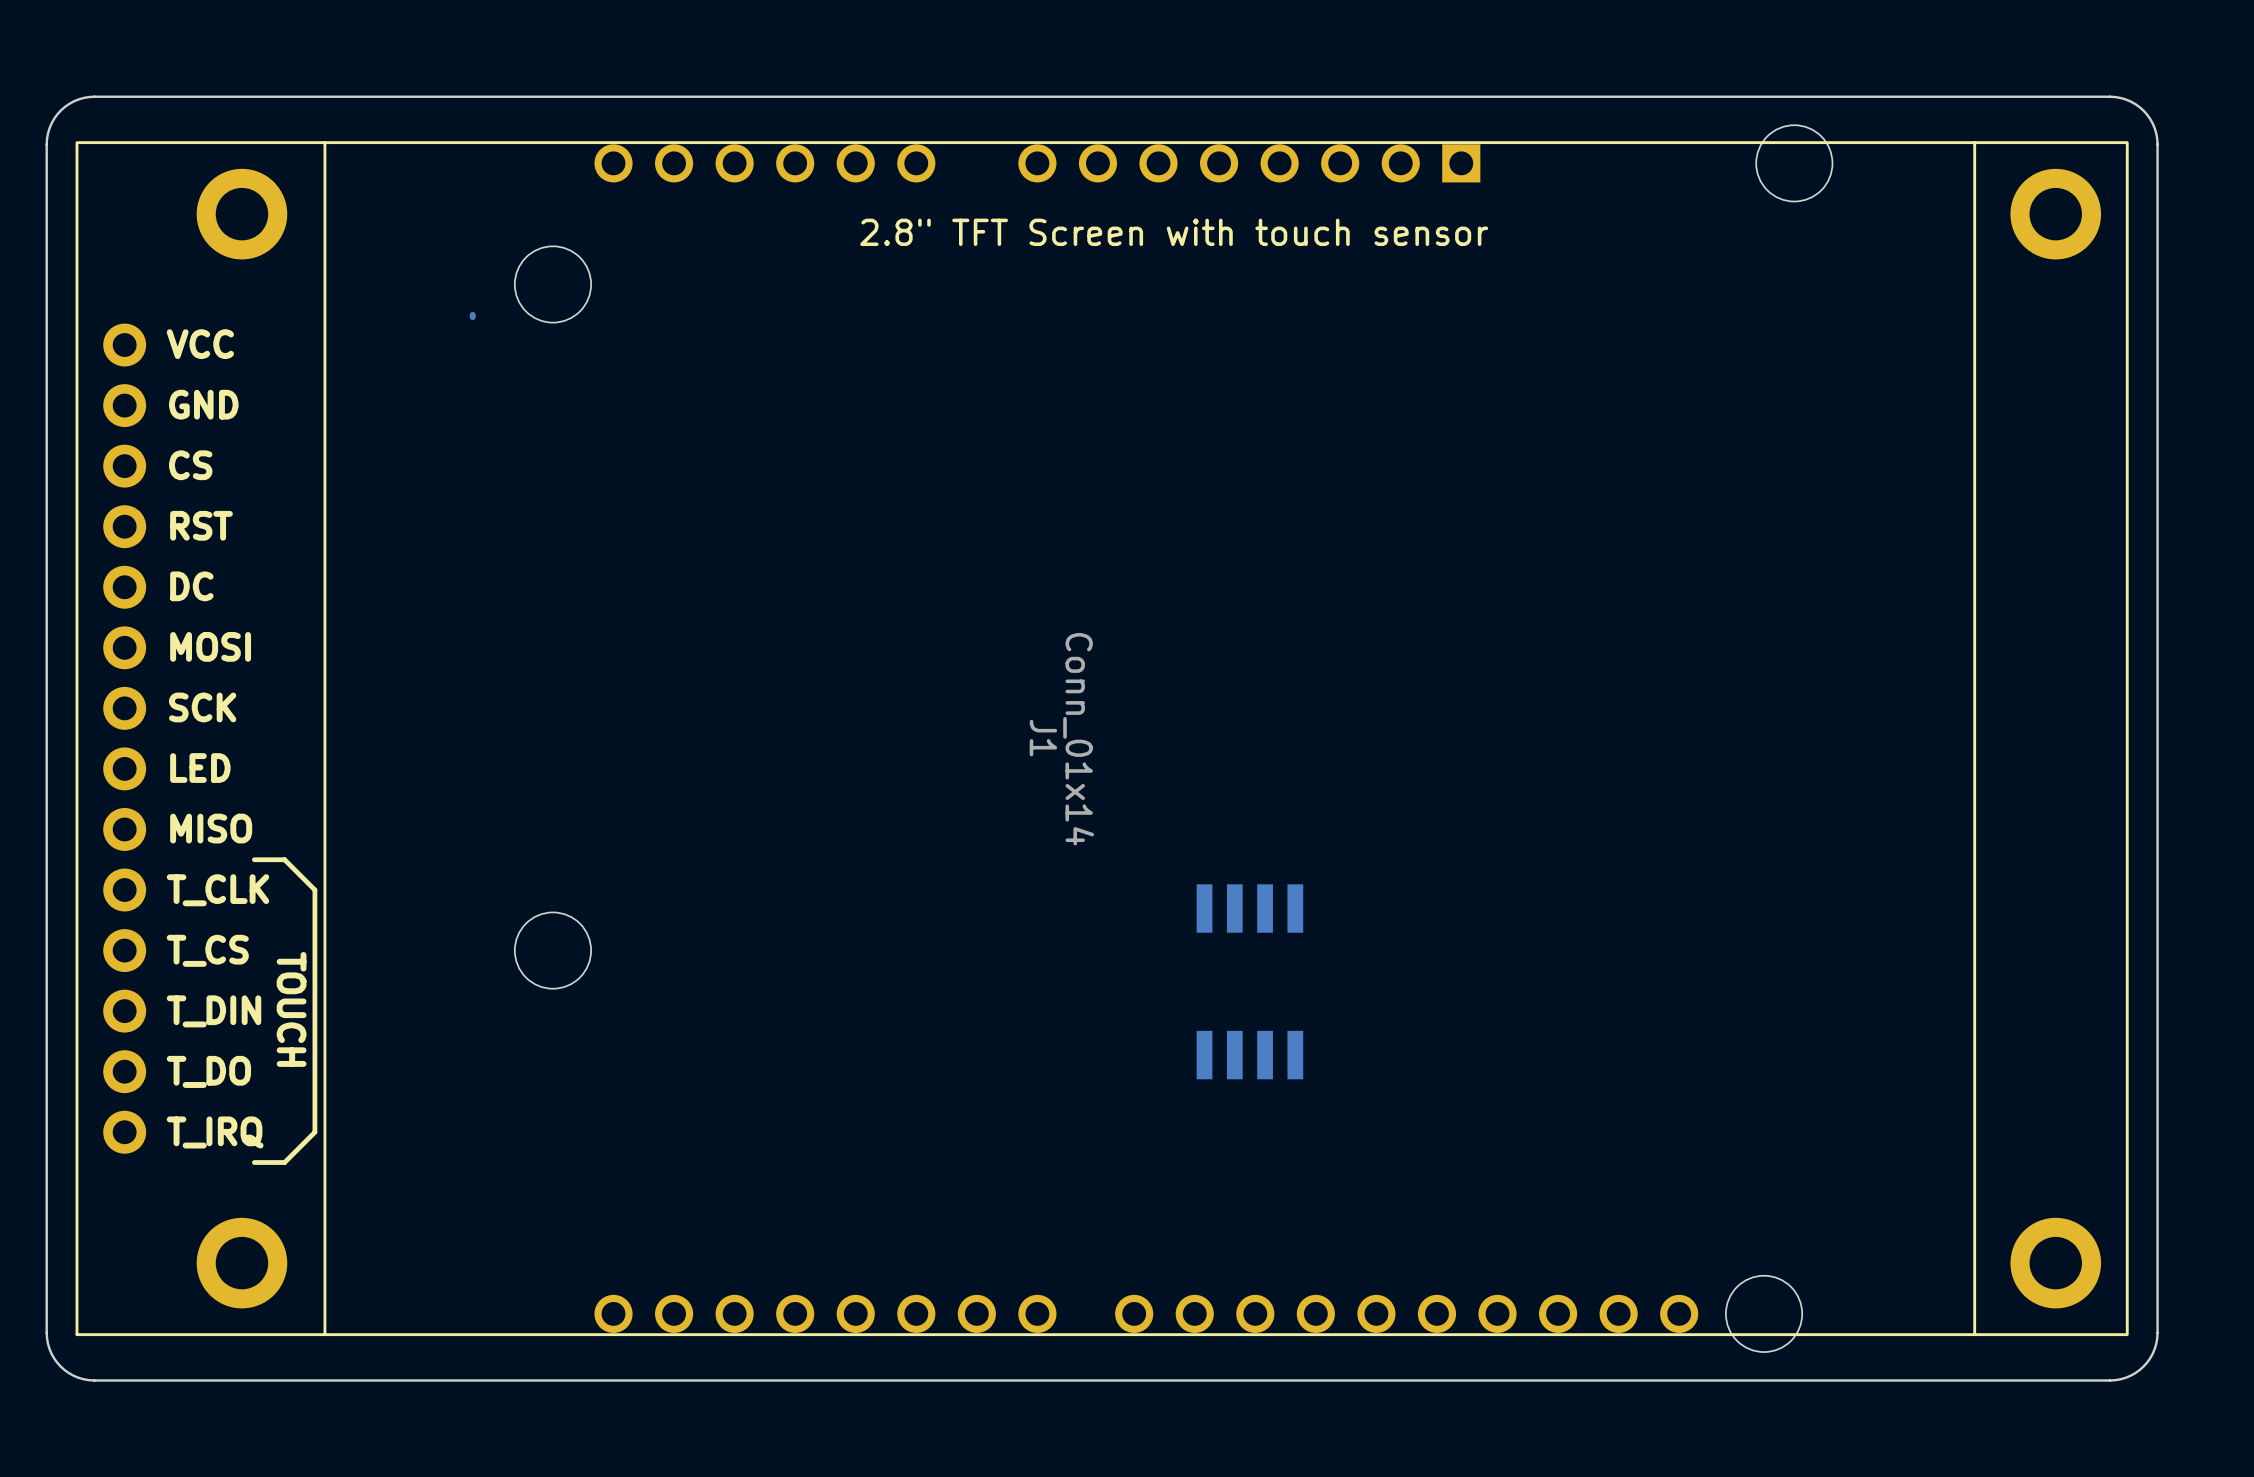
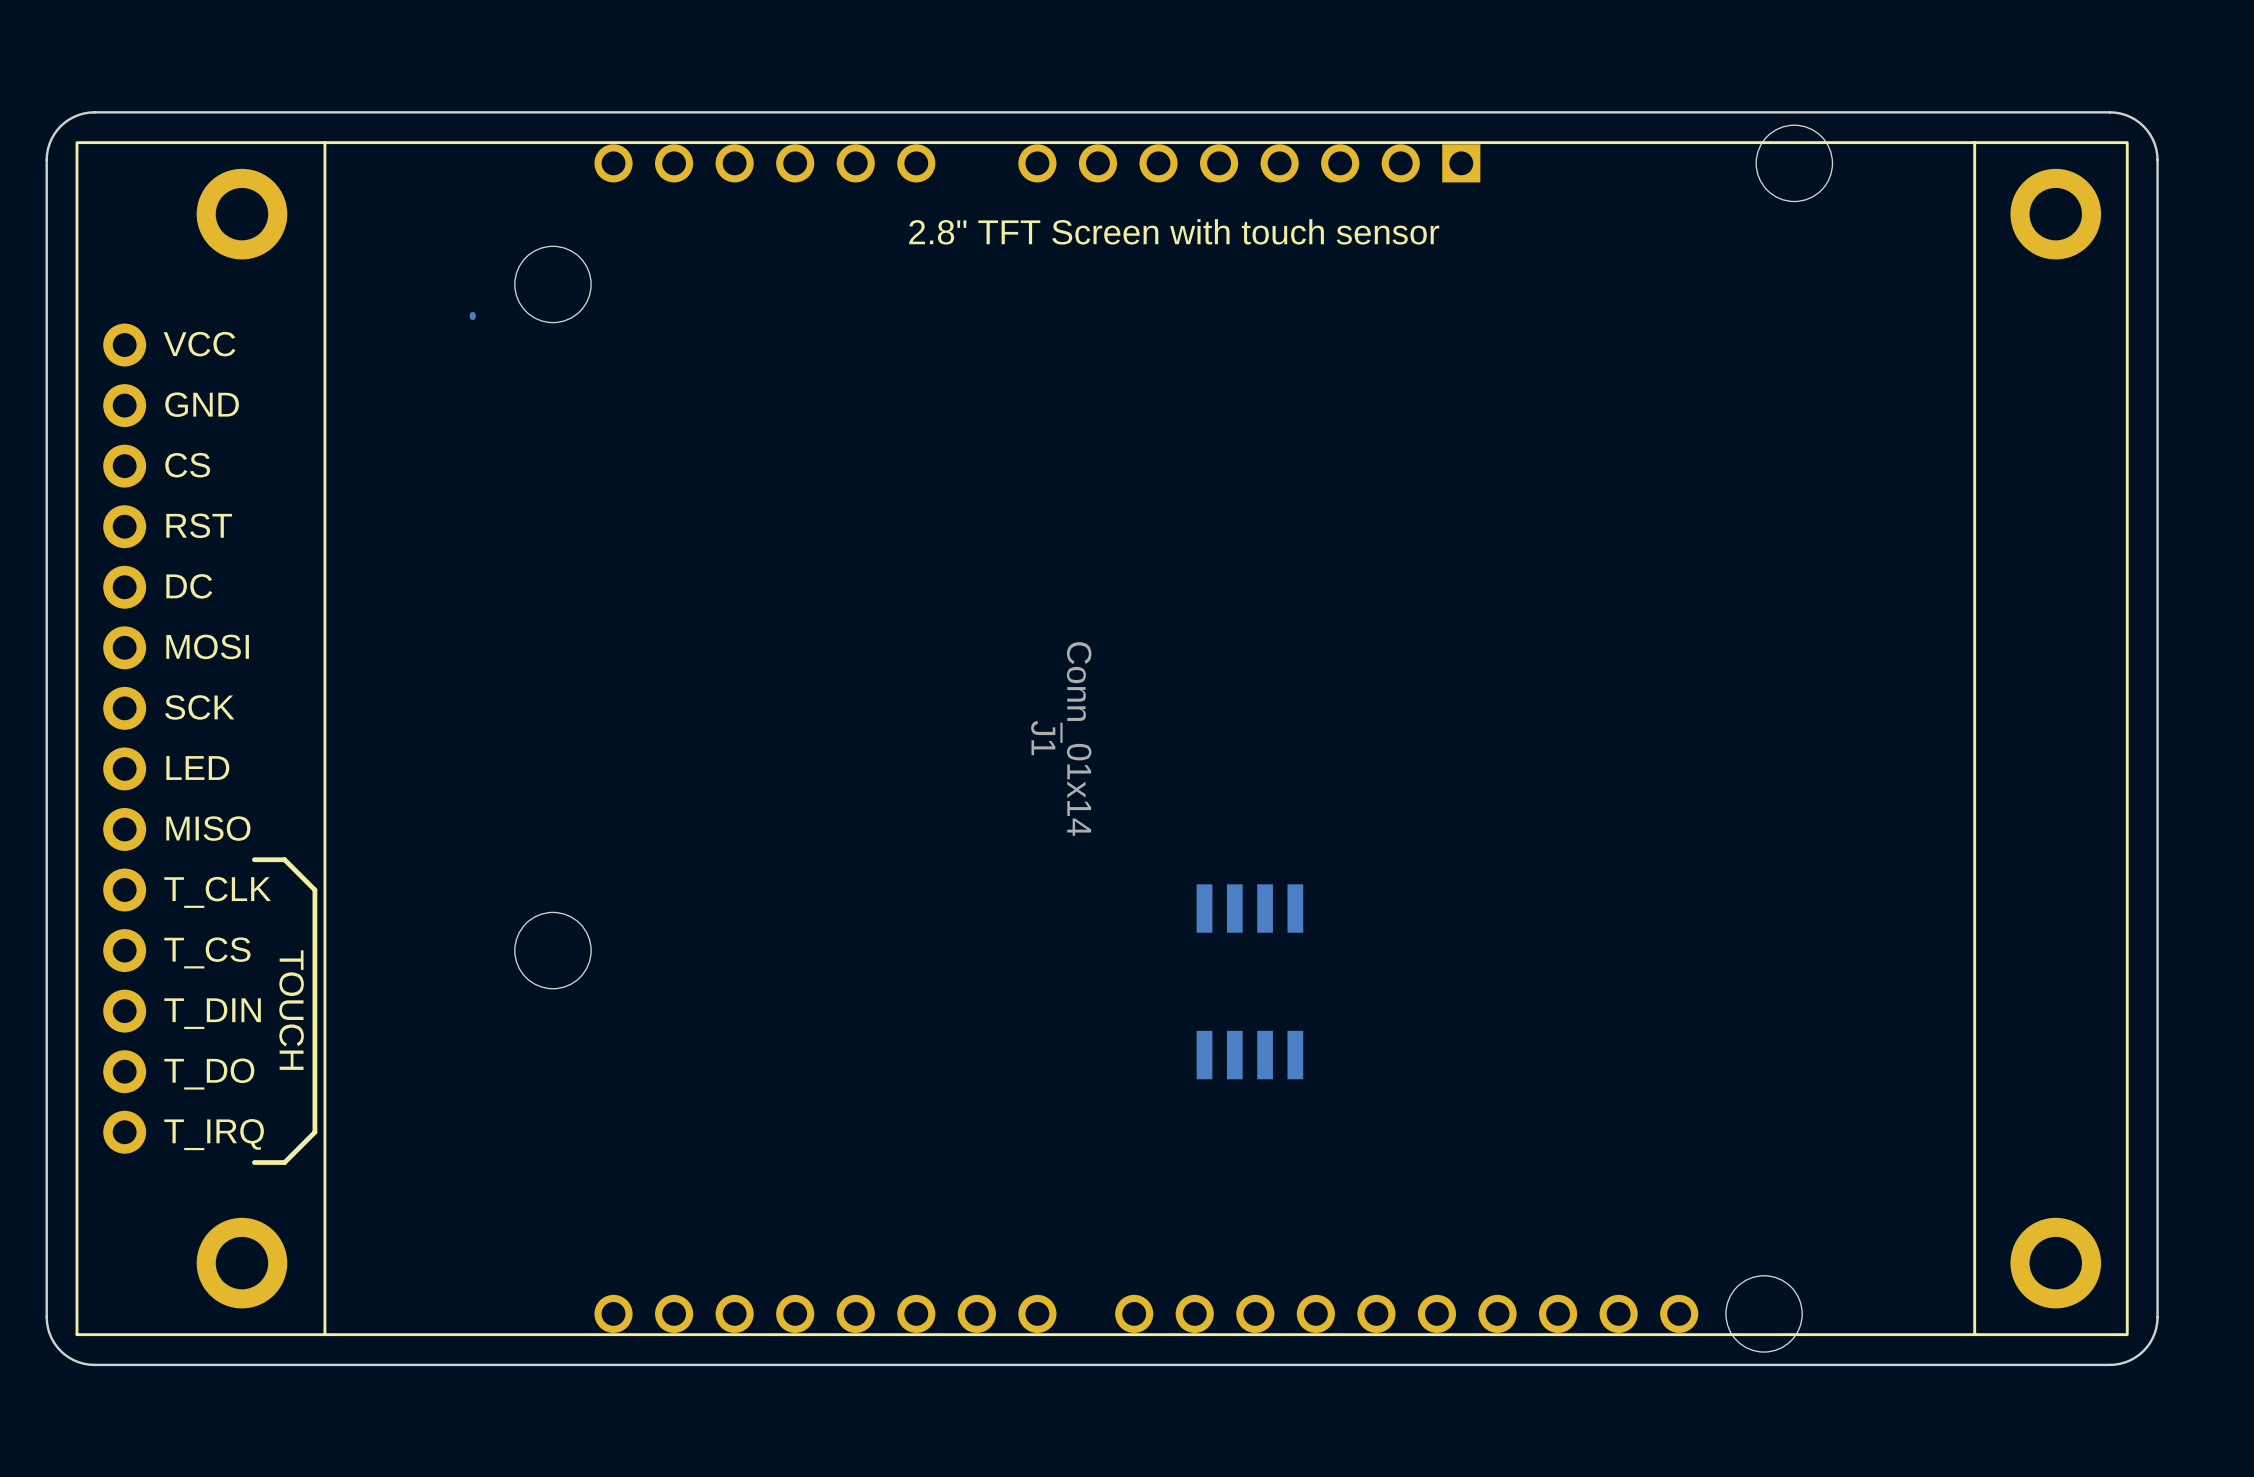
board edge: (46, 160) (47, 133) (57, 114) (73, 101) (94, 96) (2109, 96) (2130, 101) (2147, 114) (2156, 133) (2157, 160) -> (46, 160) (51, 139) (60, 126) (78, 115) (94, 112) (2109, 112) (2130, 117) (2143, 126) (2152, 139) (2157, 160)
board edge: (46, 1317) (47, 1343) (57, 1362) (73, 1375) (94, 1380) (2109, 1380) (2130, 1375) (2147, 1362) (2156, 1343) (2157, 1317) -> (46, 1317) (51, 1337) (60, 1350) (73, 1360) (94, 1364) (2109, 1364) (2130, 1360) (2143, 1350) (2154, 1332) (2157, 1317)

